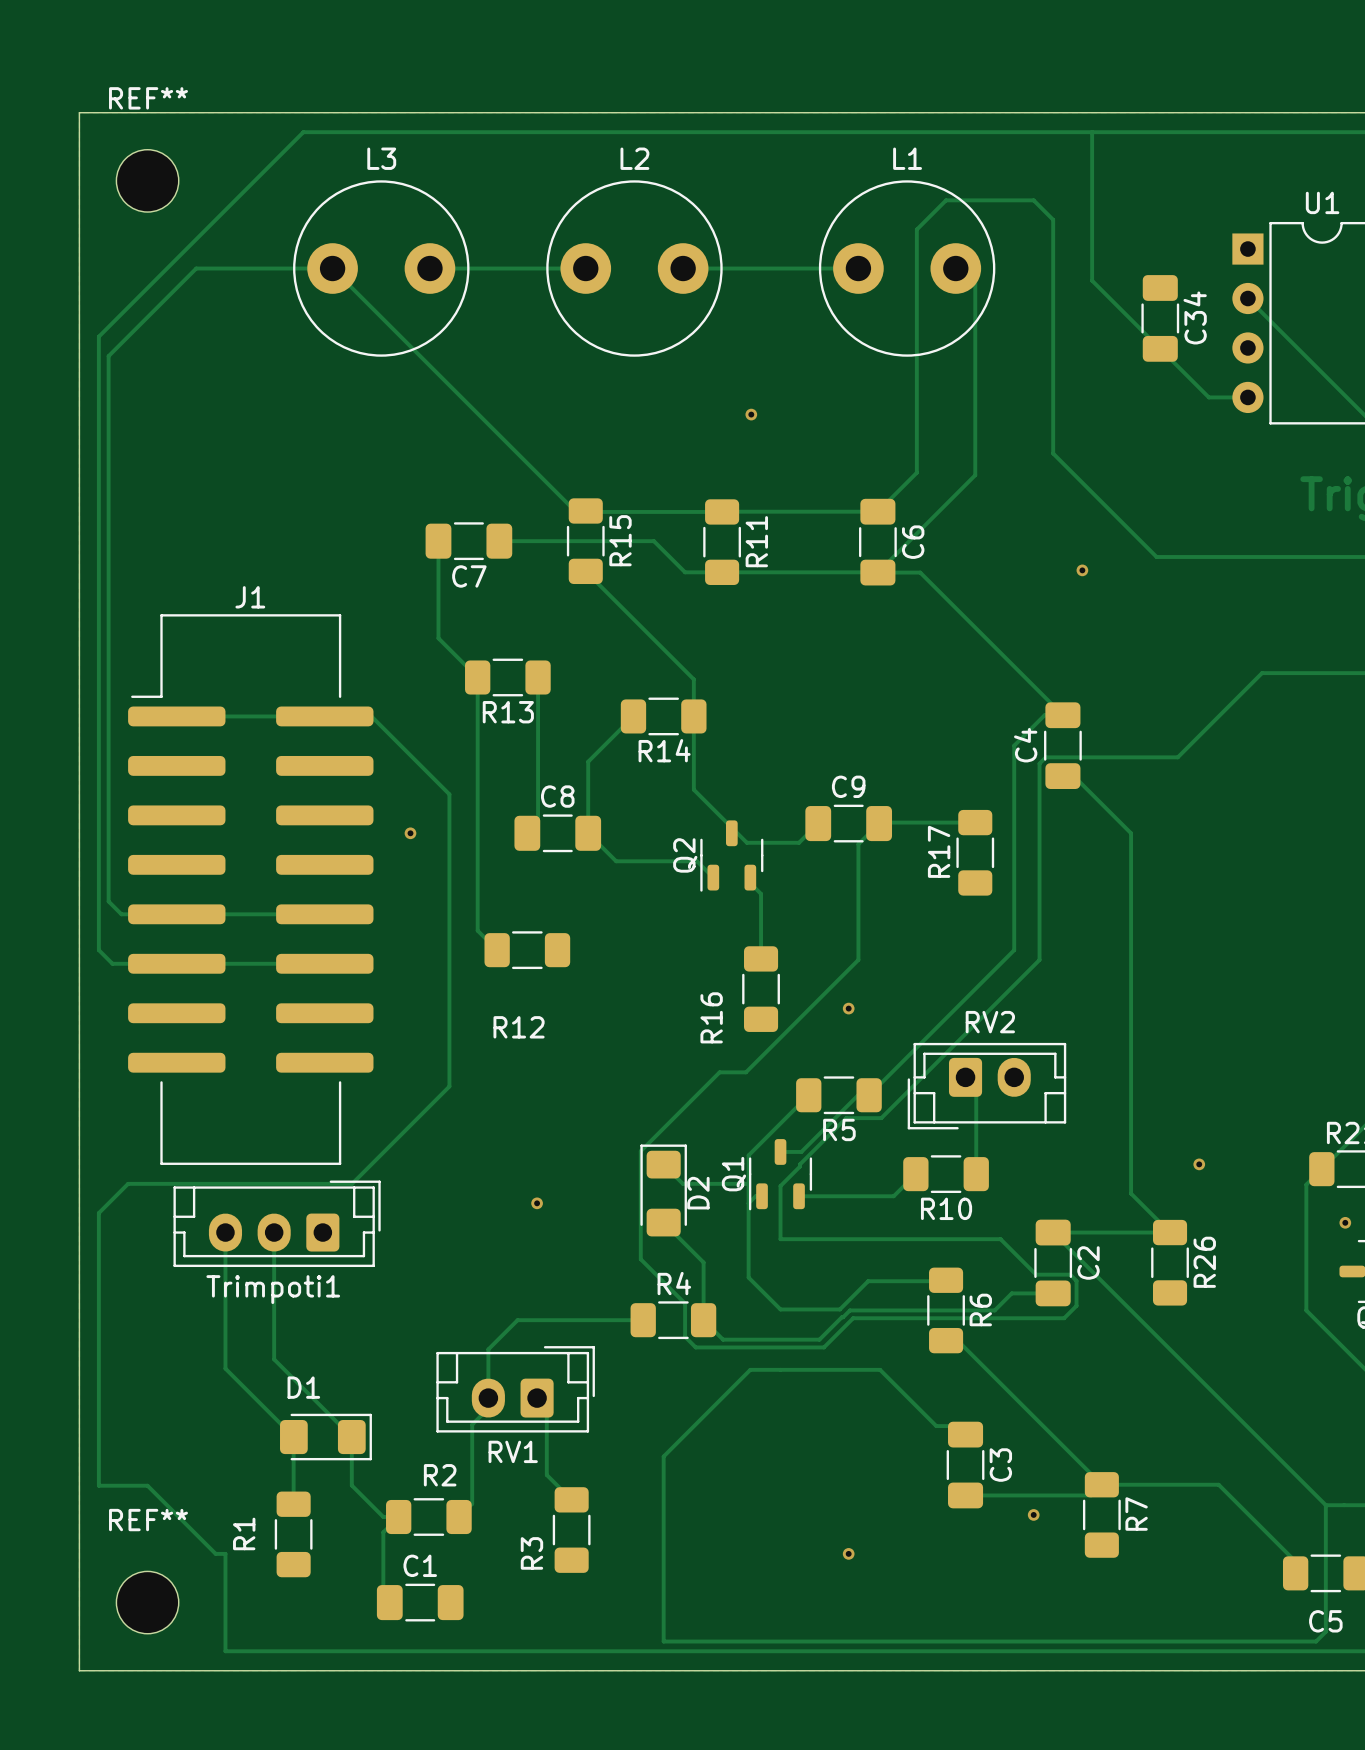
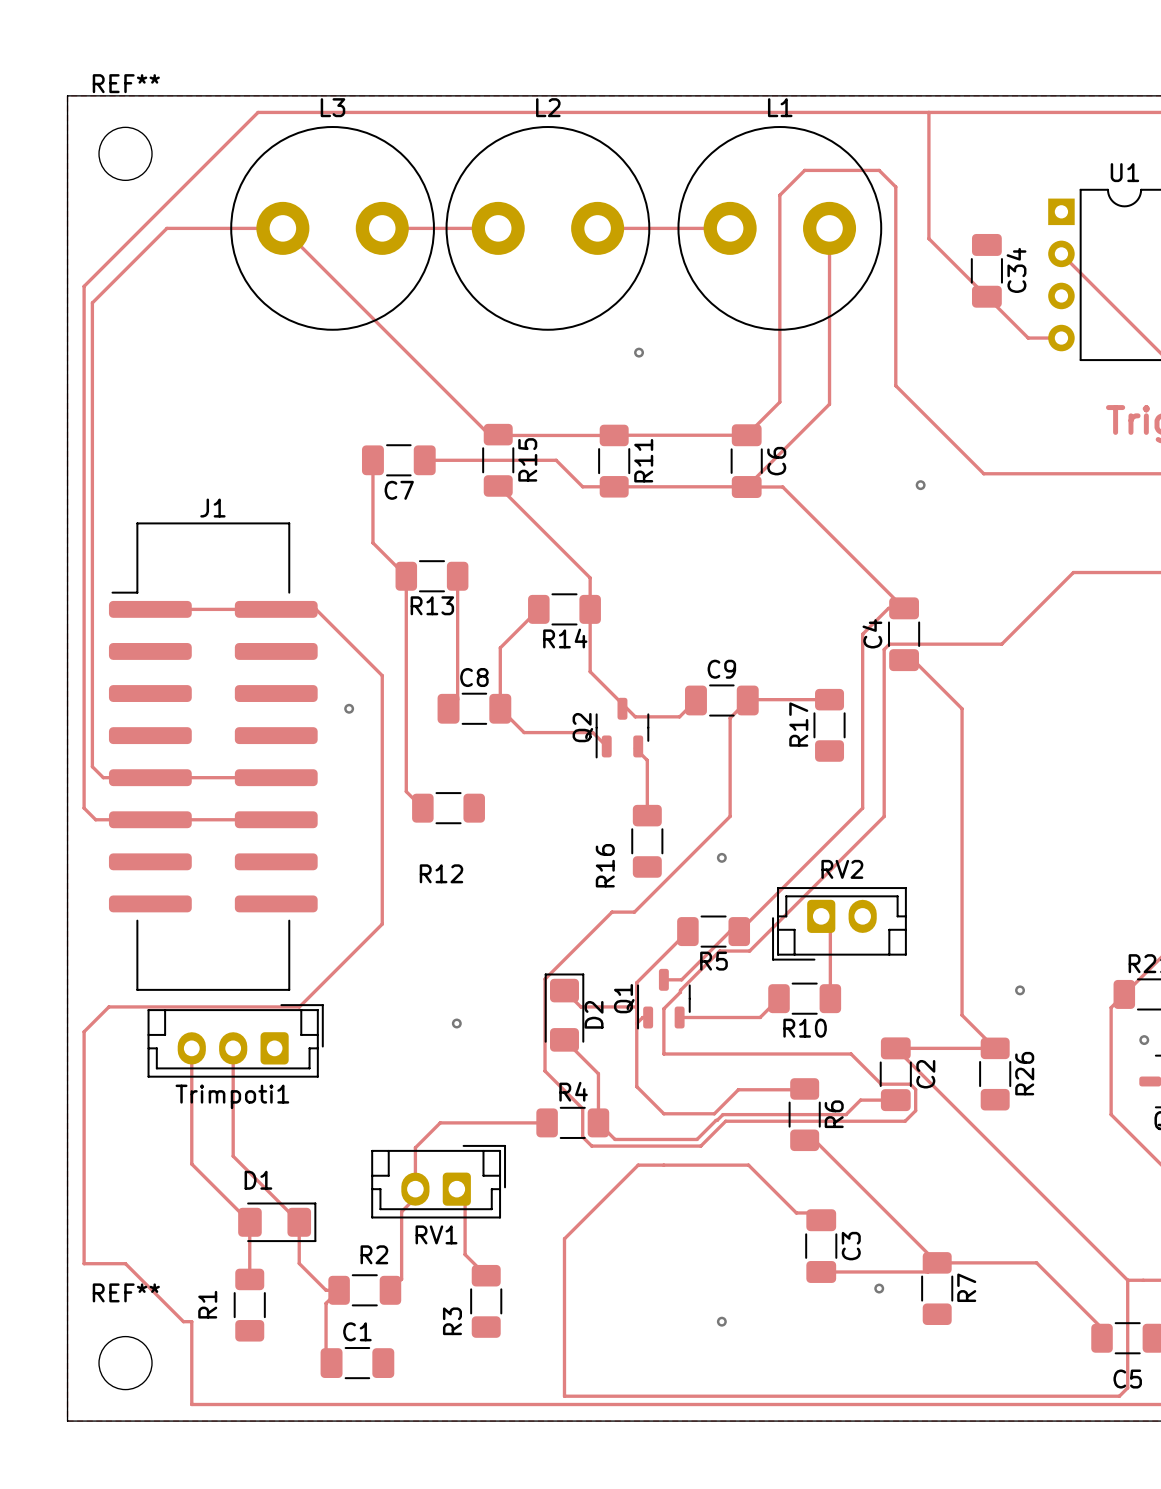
L3 footprint: [293, 180, 470, 357] -> [230, 126, 435, 331]
L2 footprint: [546, 180, 723, 357] -> [445, 126, 651, 331]
L1 footprint: [818, 180, 996, 357] -> [677, 126, 883, 331]

